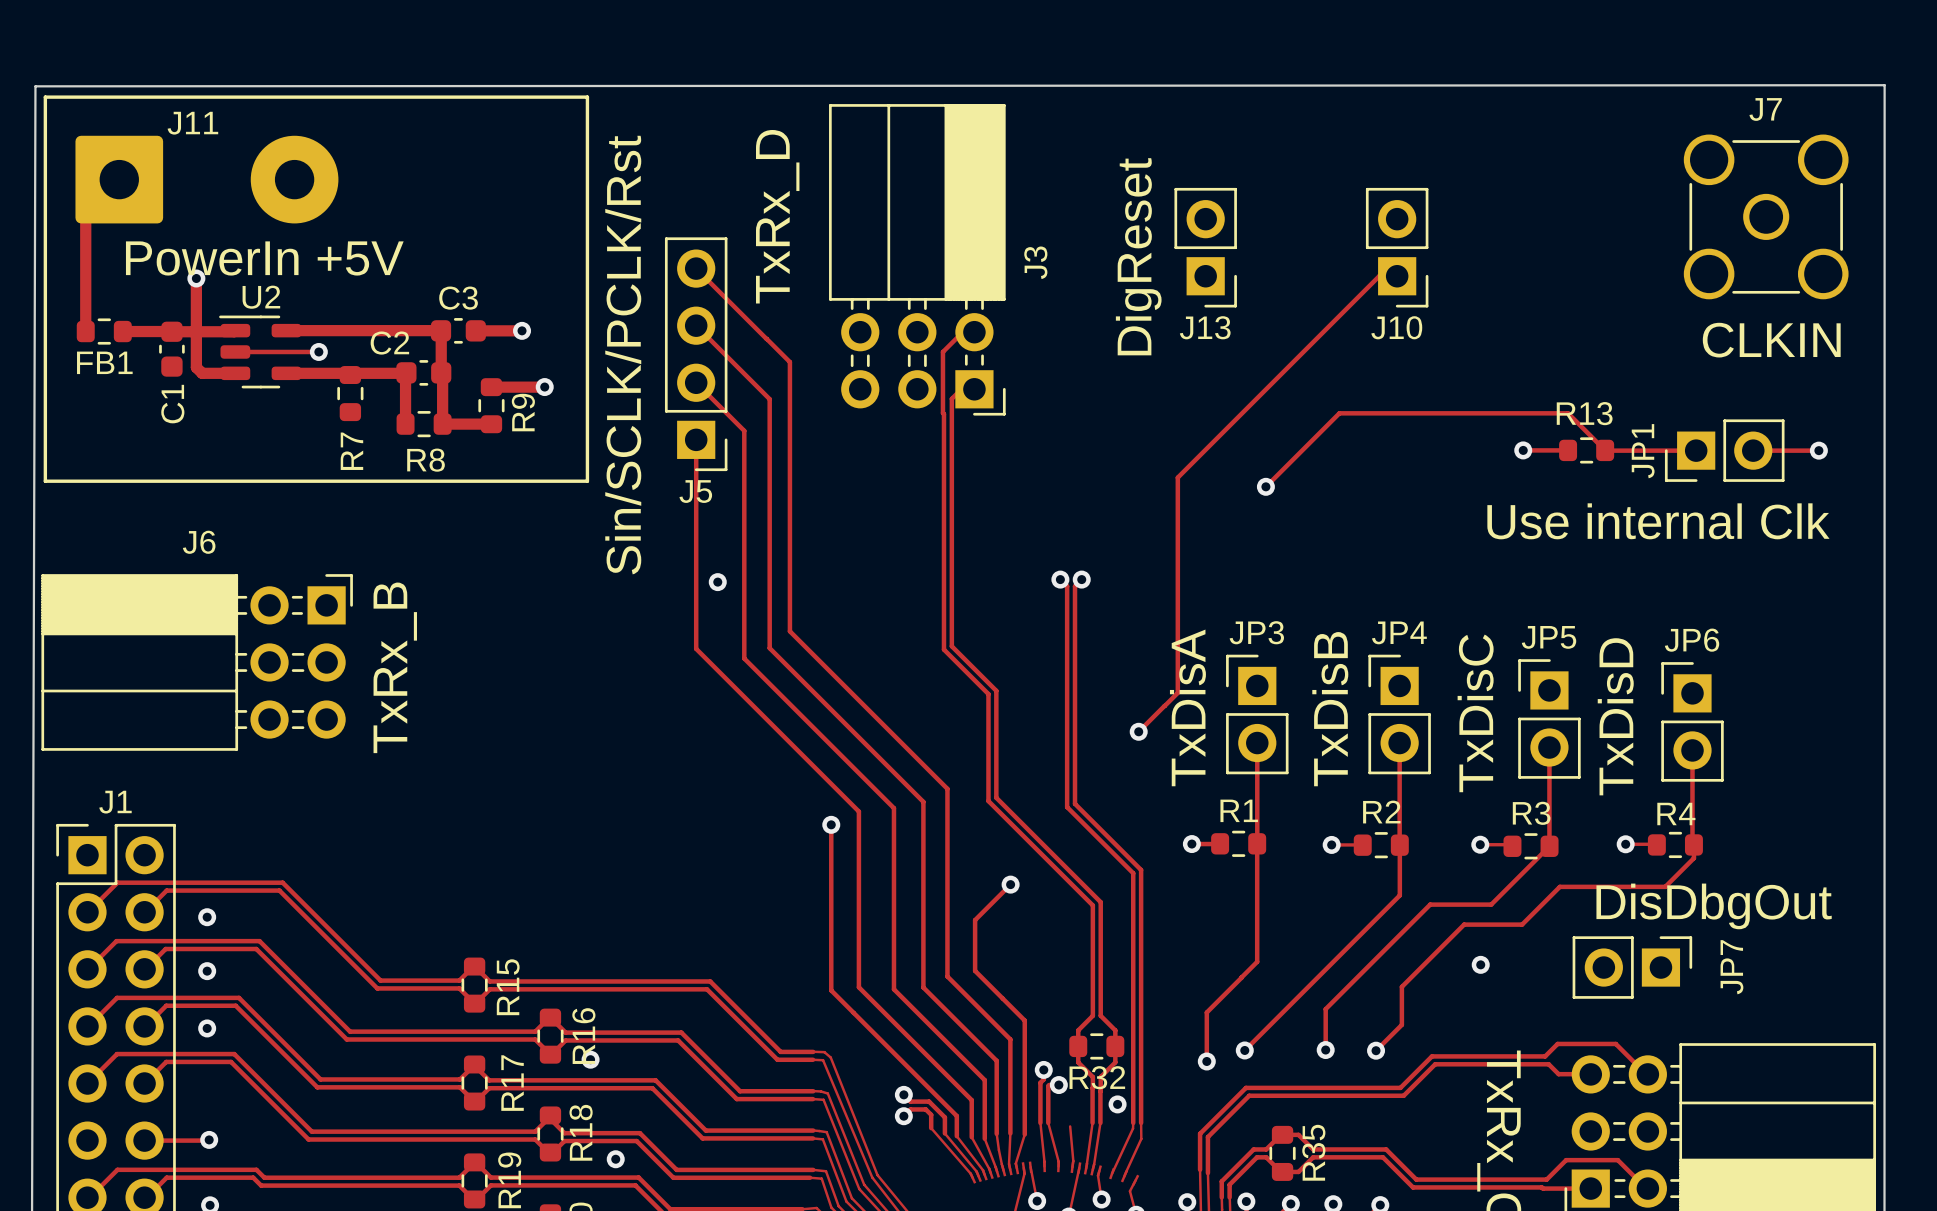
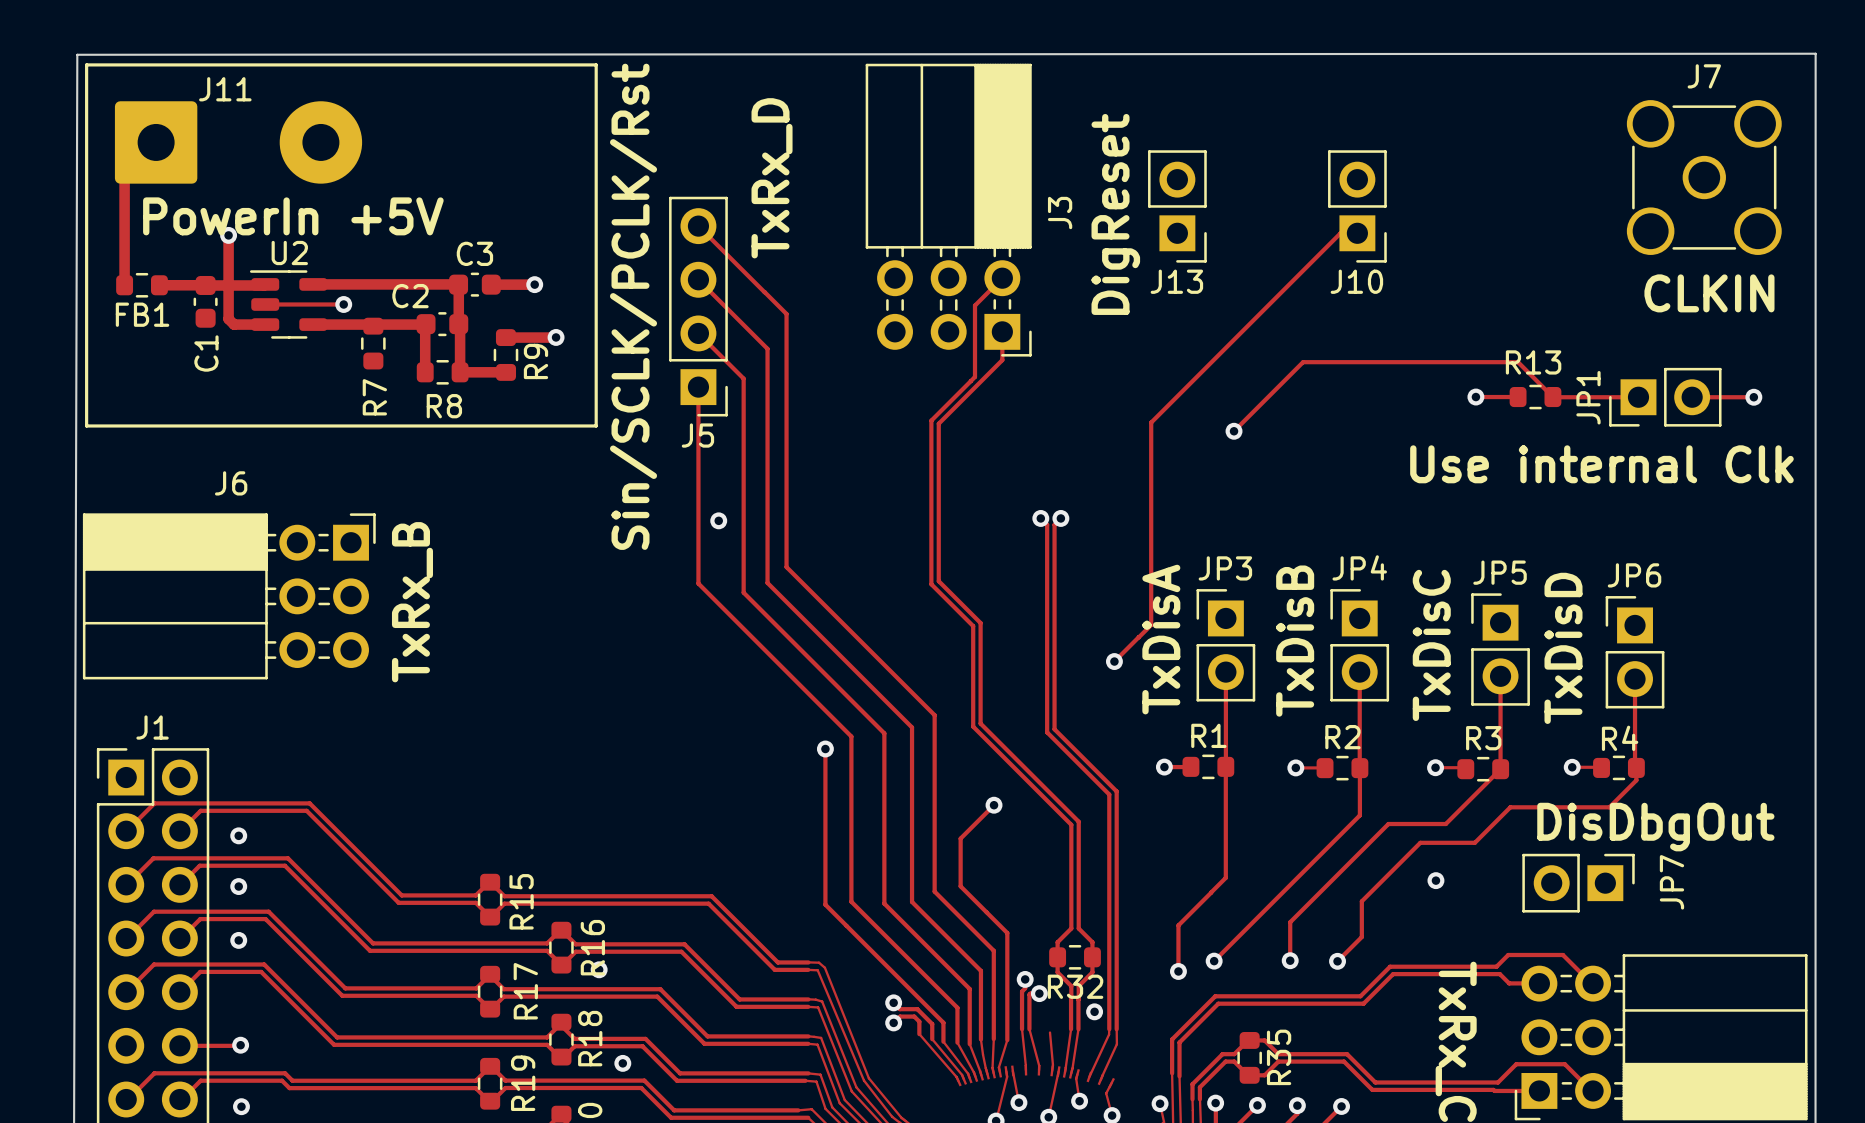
J3 position: (917, 259) -> (948, 210)
track: (974, 320) (942, 351) (943, 475) -> (1002, 278) (975, 305) (975, 376) (931, 420)
track: (973, 377) (951, 398) (951, 478) -> (1002, 331) (1002, 360) (938, 423)

